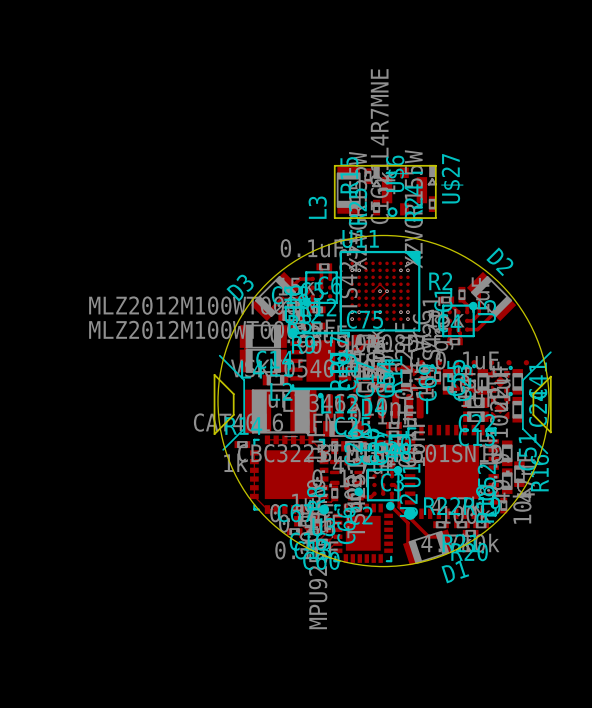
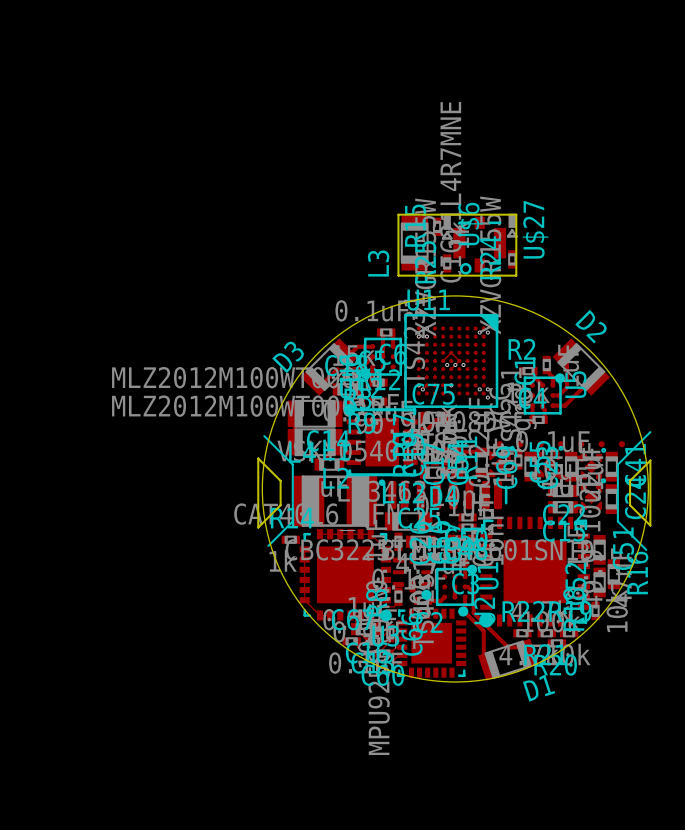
via: (407, 263) -> none
via: none -> (479, 332)
via: none -> (487, 332)
via: (400, 270) -> none
via: (407, 270) -> none
via: (380, 291) -> none
via: (387, 291) -> none
via: none -> (447, 365)
via: none -> (455, 365)
via: none -> (463, 365)
track: none -> (426, 385) (422, 389)
via: (359, 312) -> none
via: (400, 312) -> none
via: (407, 312) -> none
via: none -> (422, 389)
via: none -> (479, 389)
via: none -> (487, 389)
via: (352, 319) -> none
via: (407, 319) -> none
via: none -> (487, 397)

